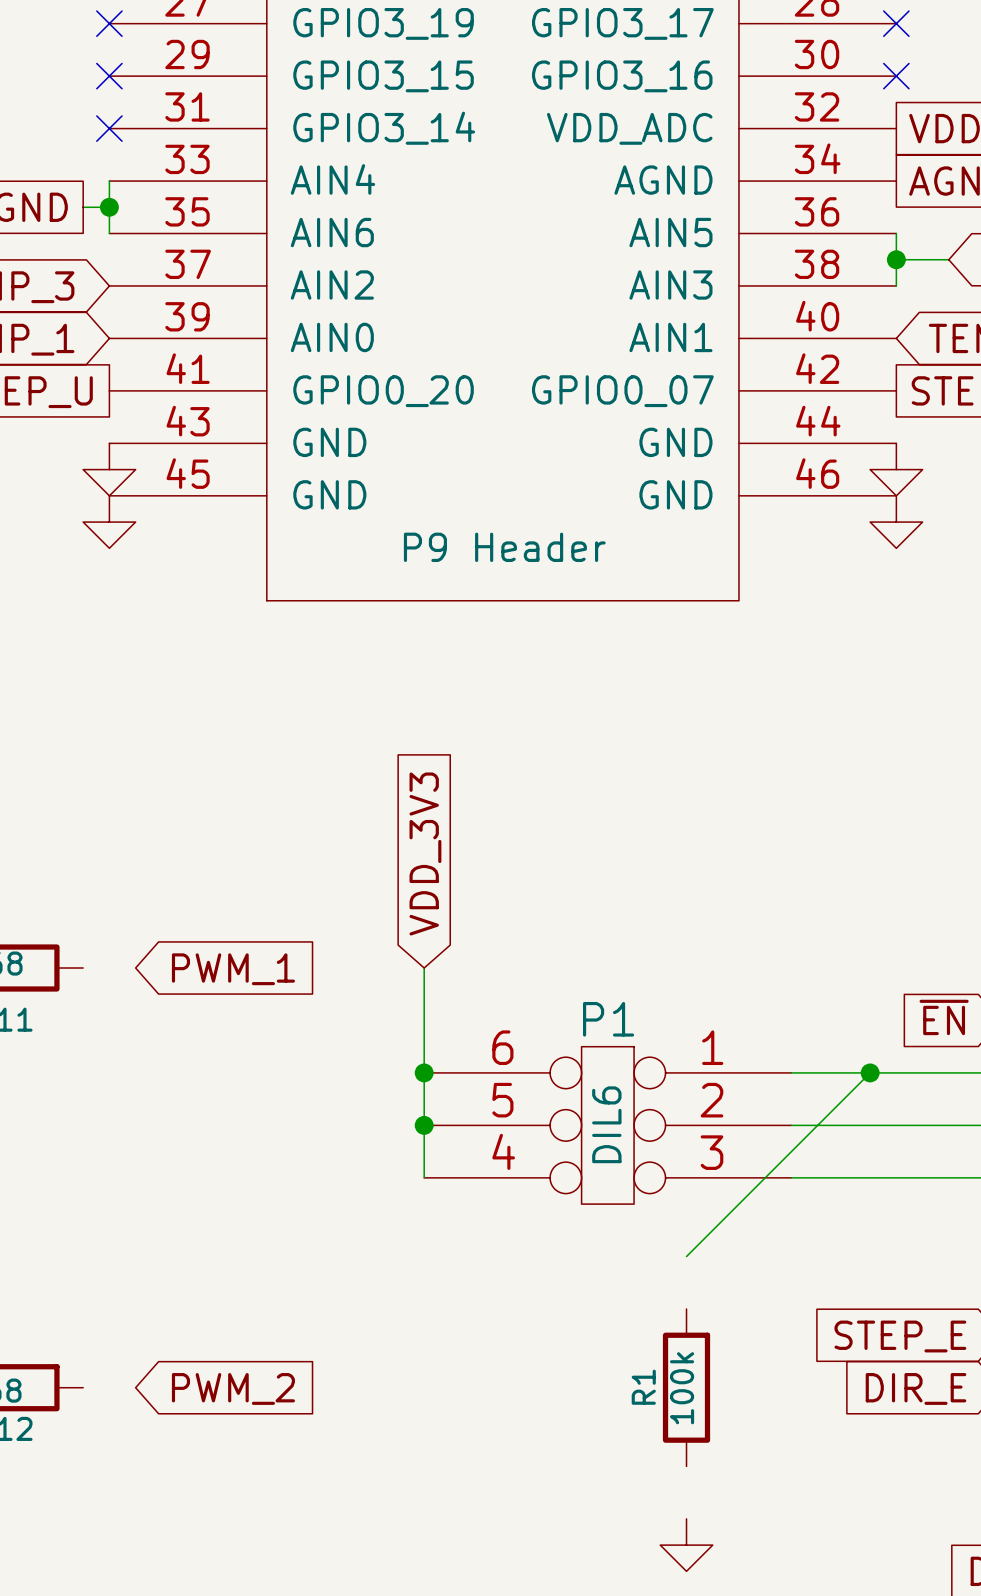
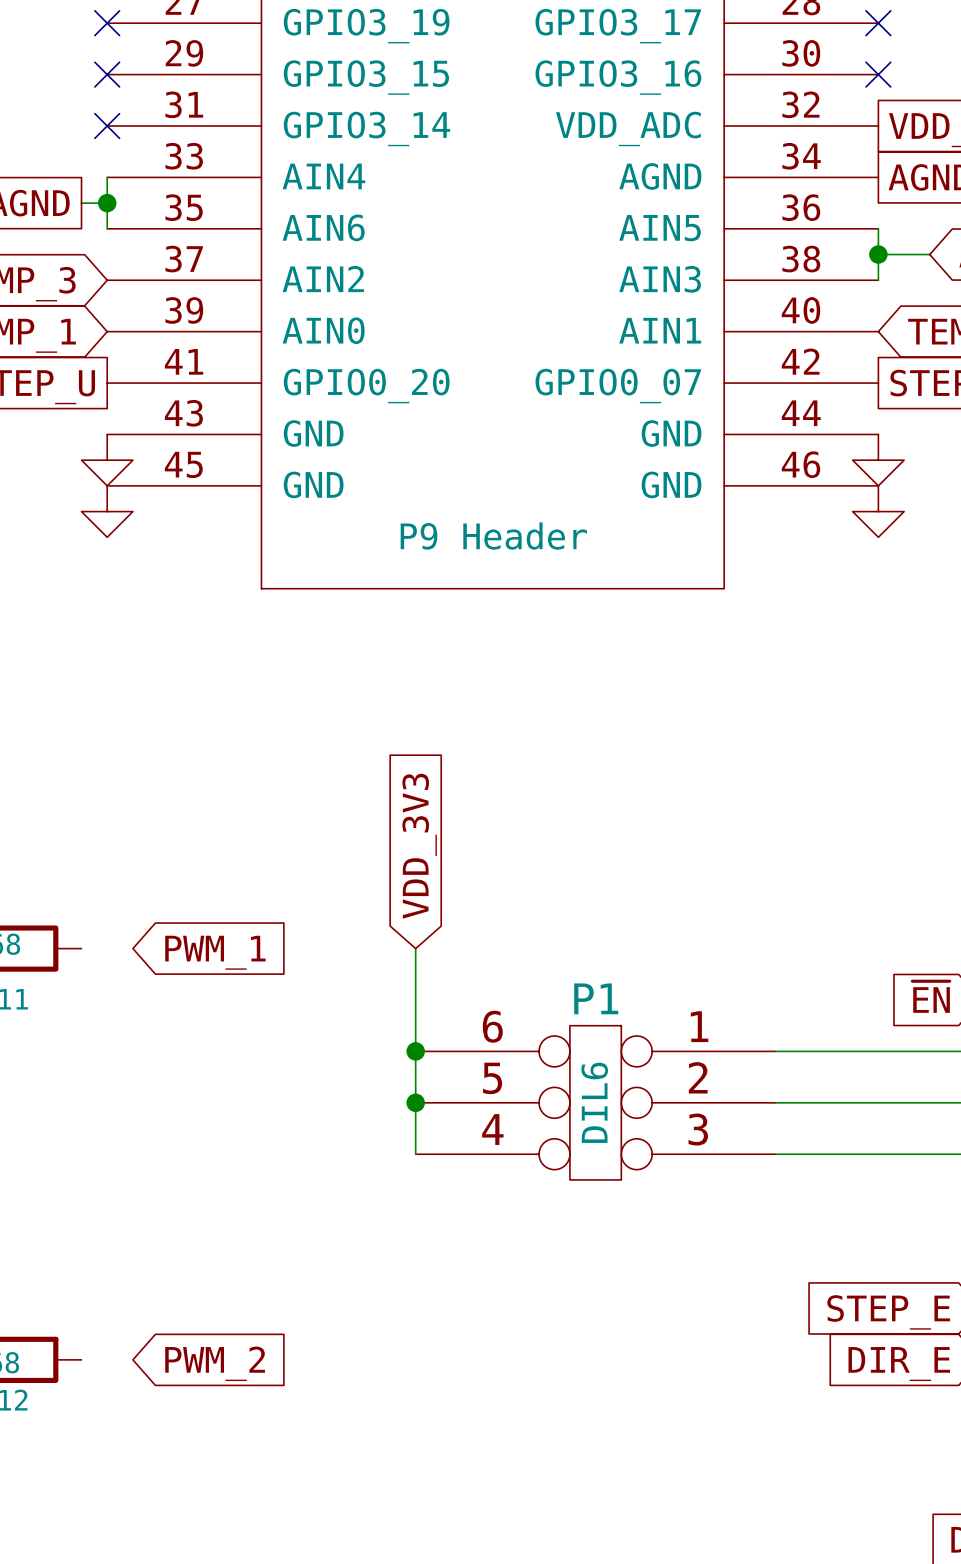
wire: (870, 1072) (686, 1256) -> none
junction: (870, 1072) -> none
R1: 100k (686, 1387) -> none
power symbol: (686, 1545) -> none

